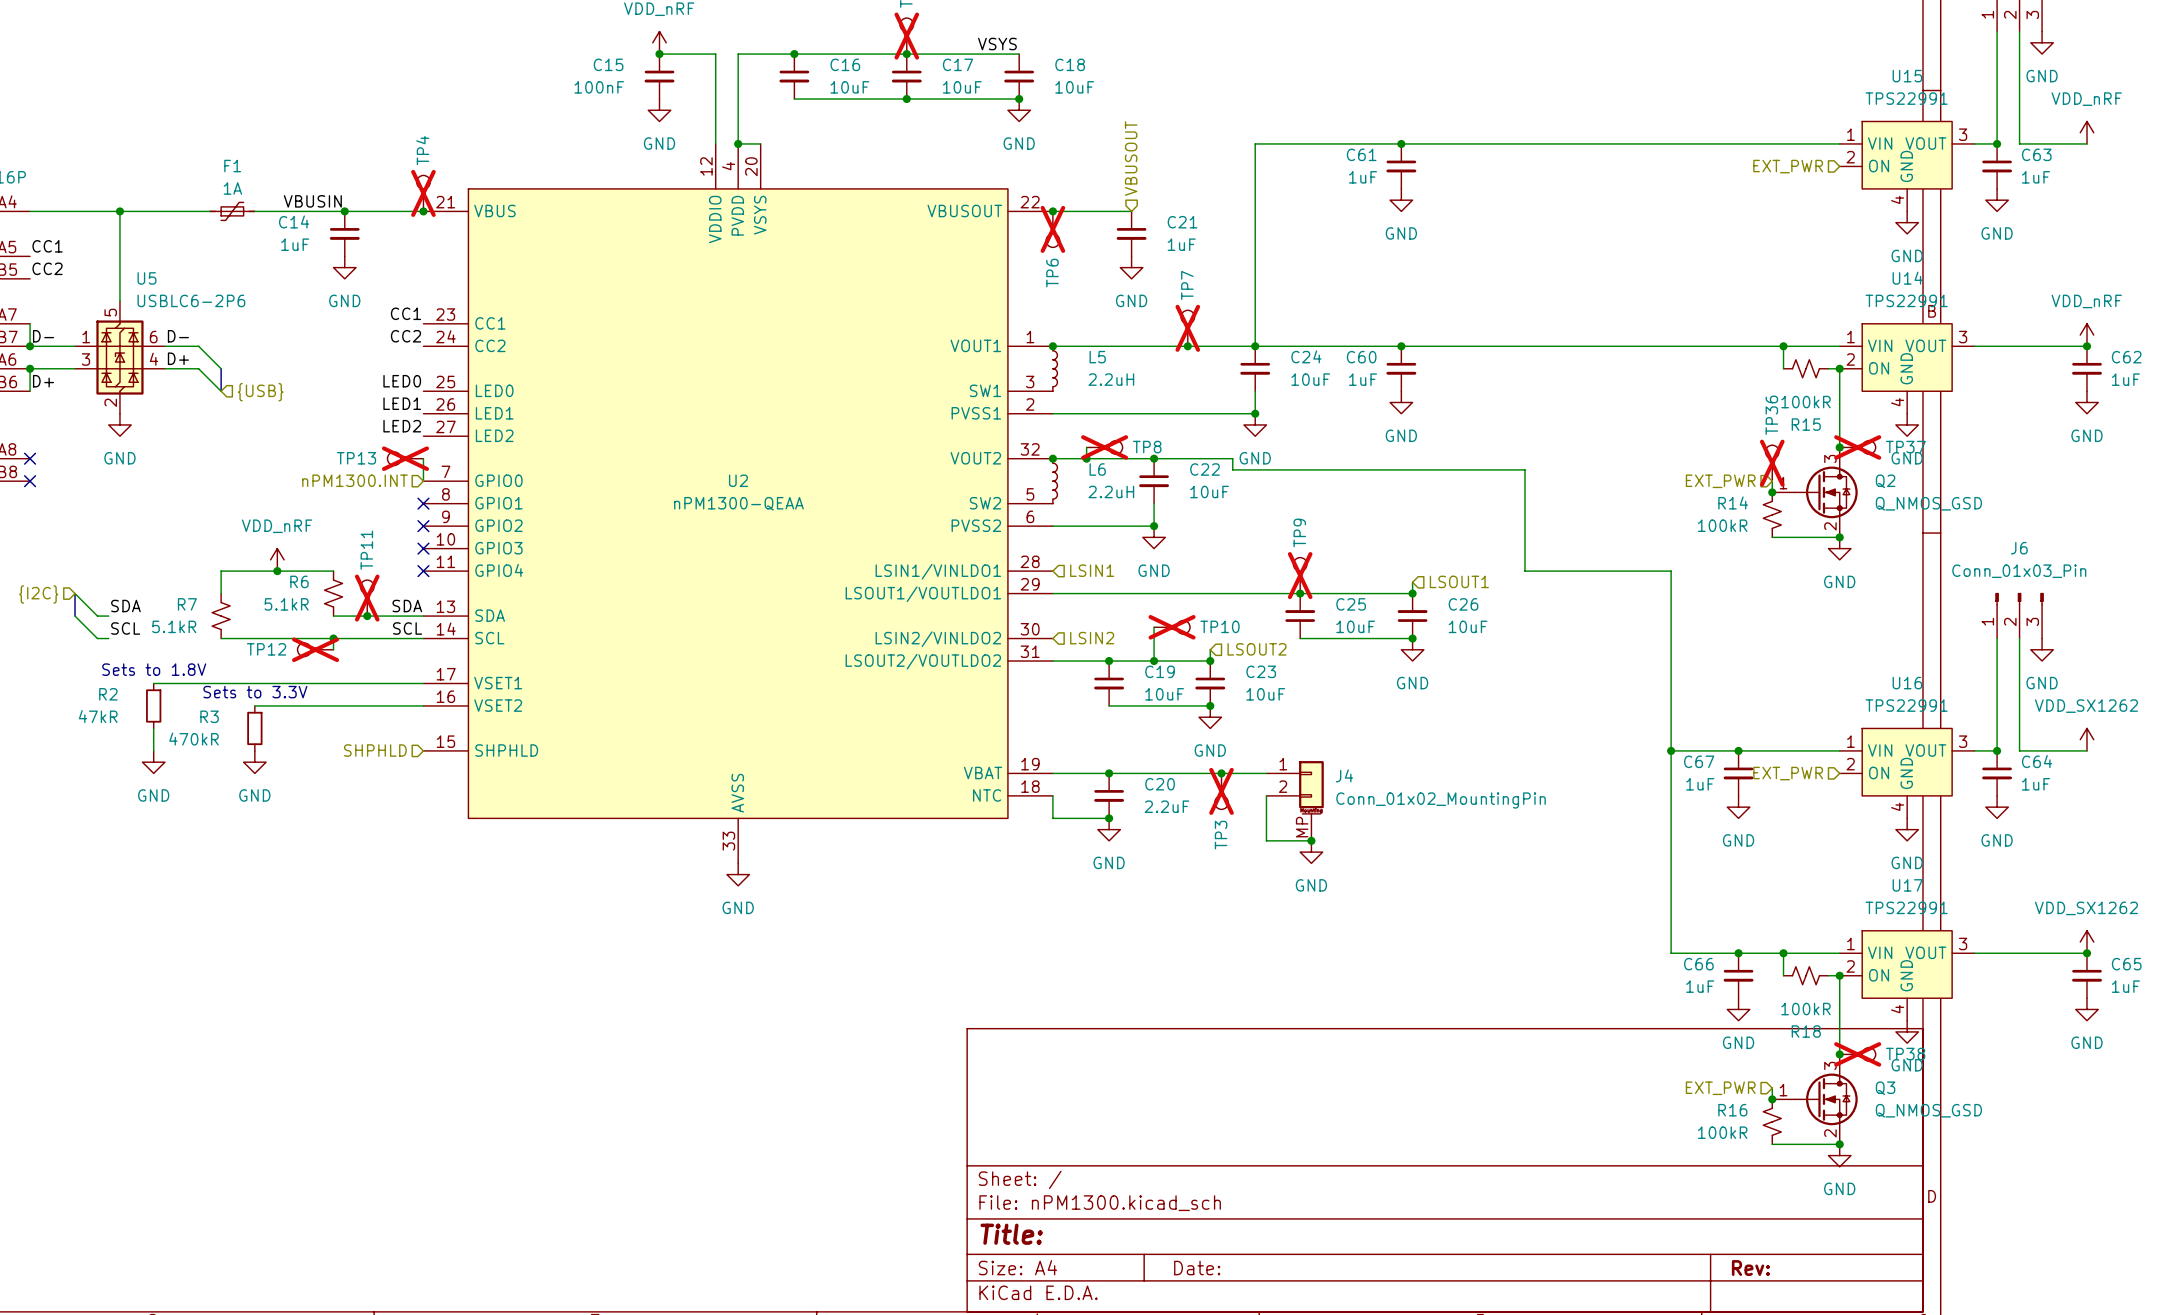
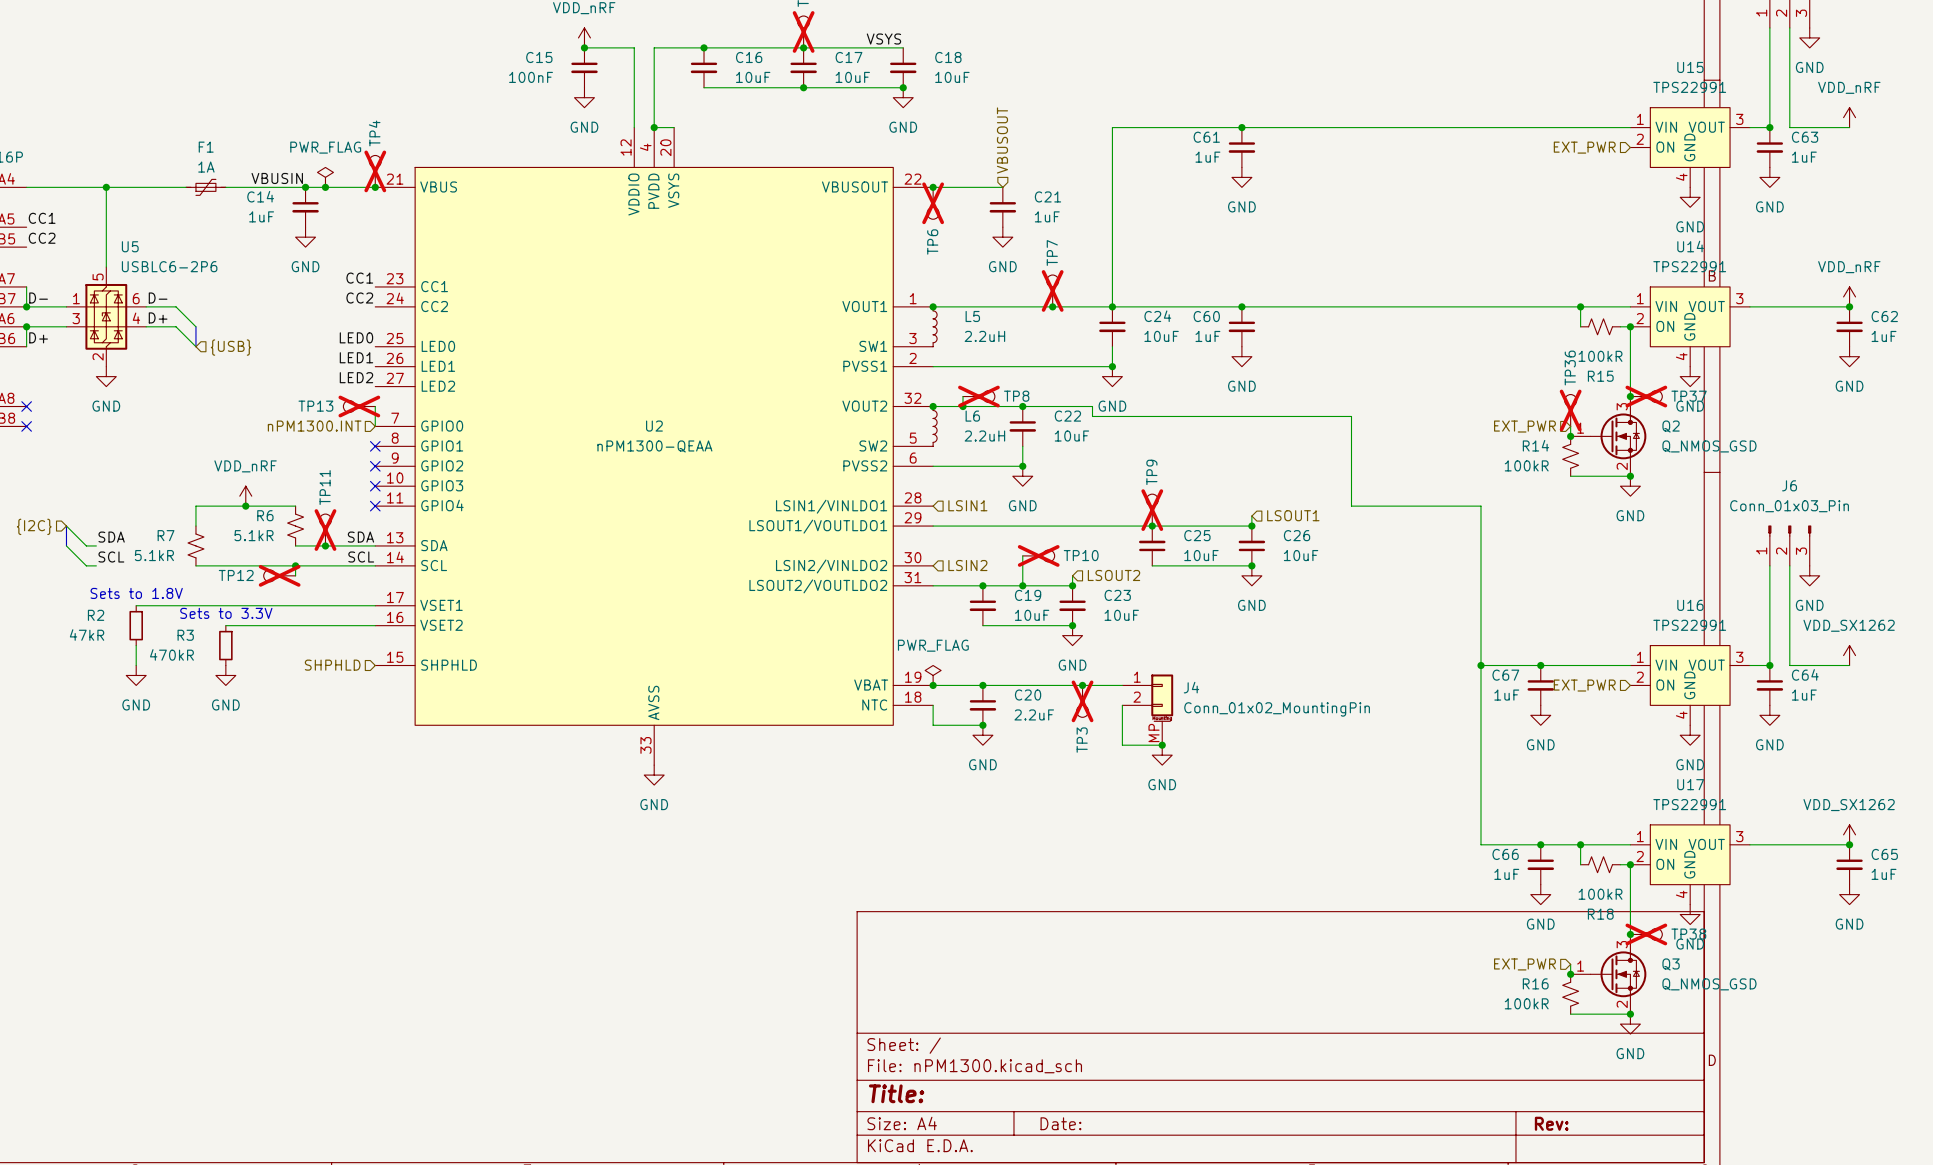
power symbol: none -> PWR_FLAG (325, 177)
junction: none -> (325, 187)
power symbol: none -> PWR_FLAG (933, 675)
junction: none -> (933, 685)

